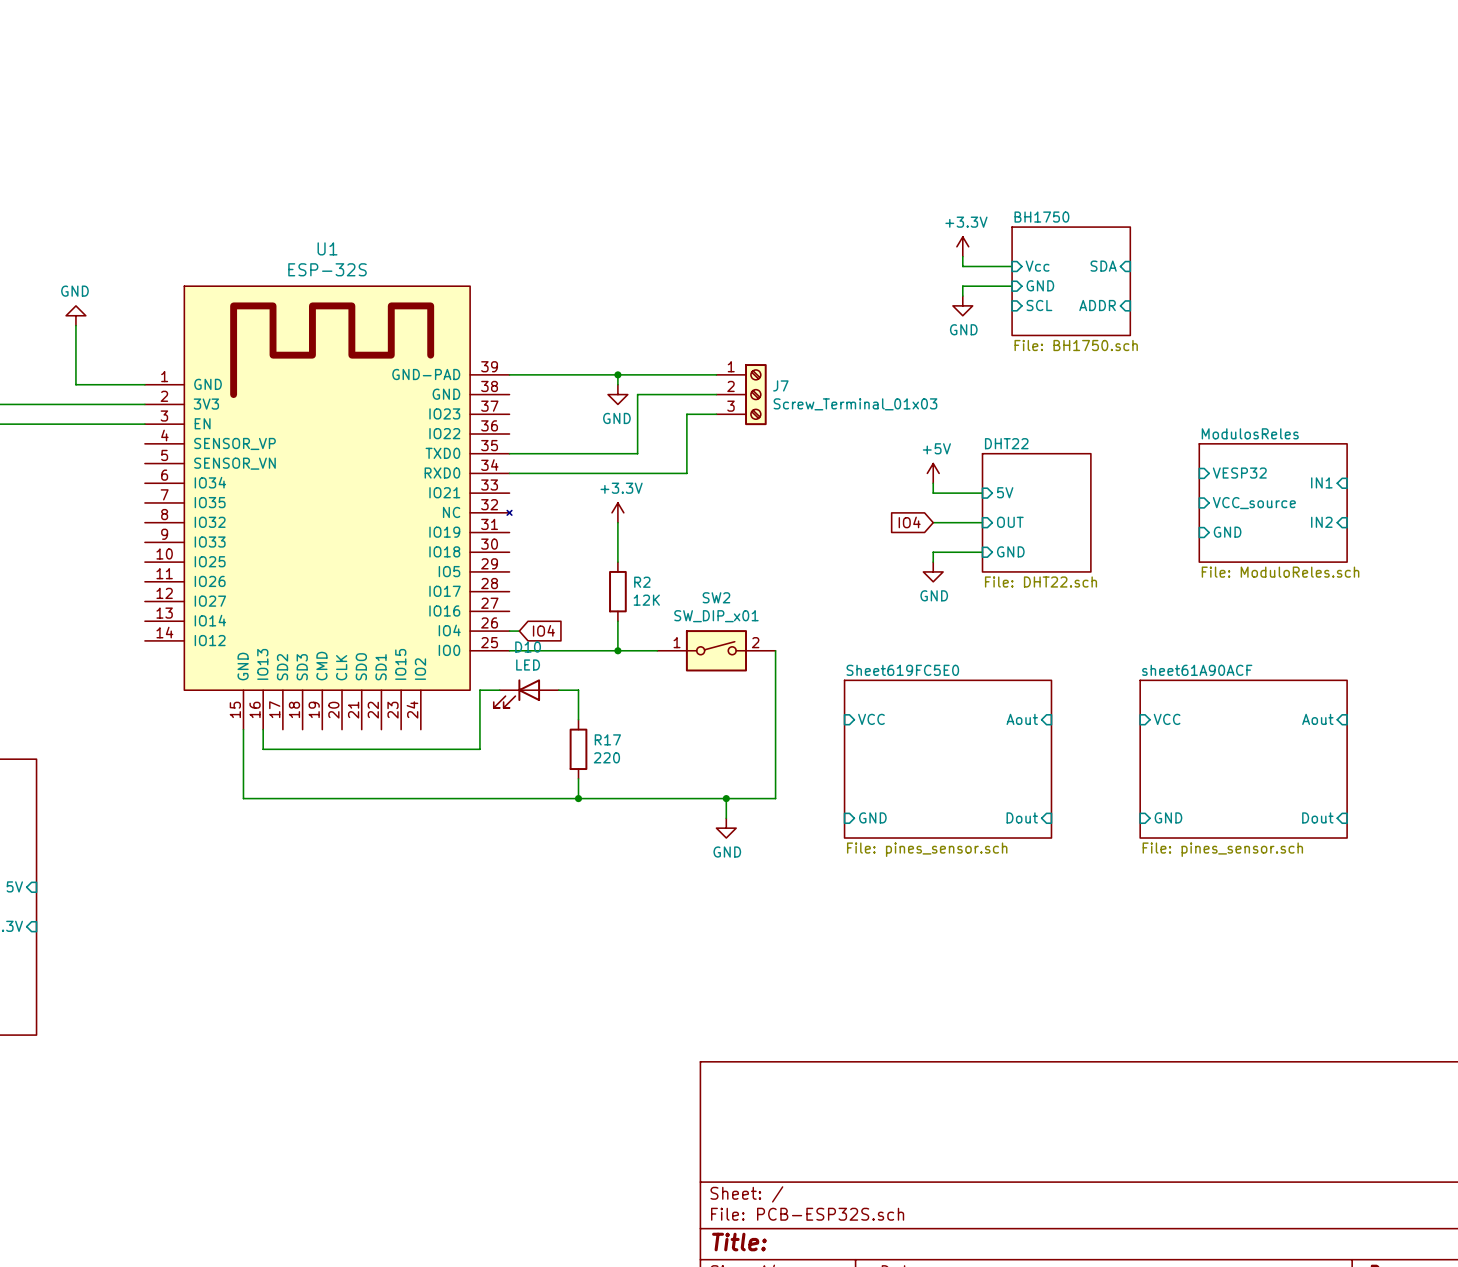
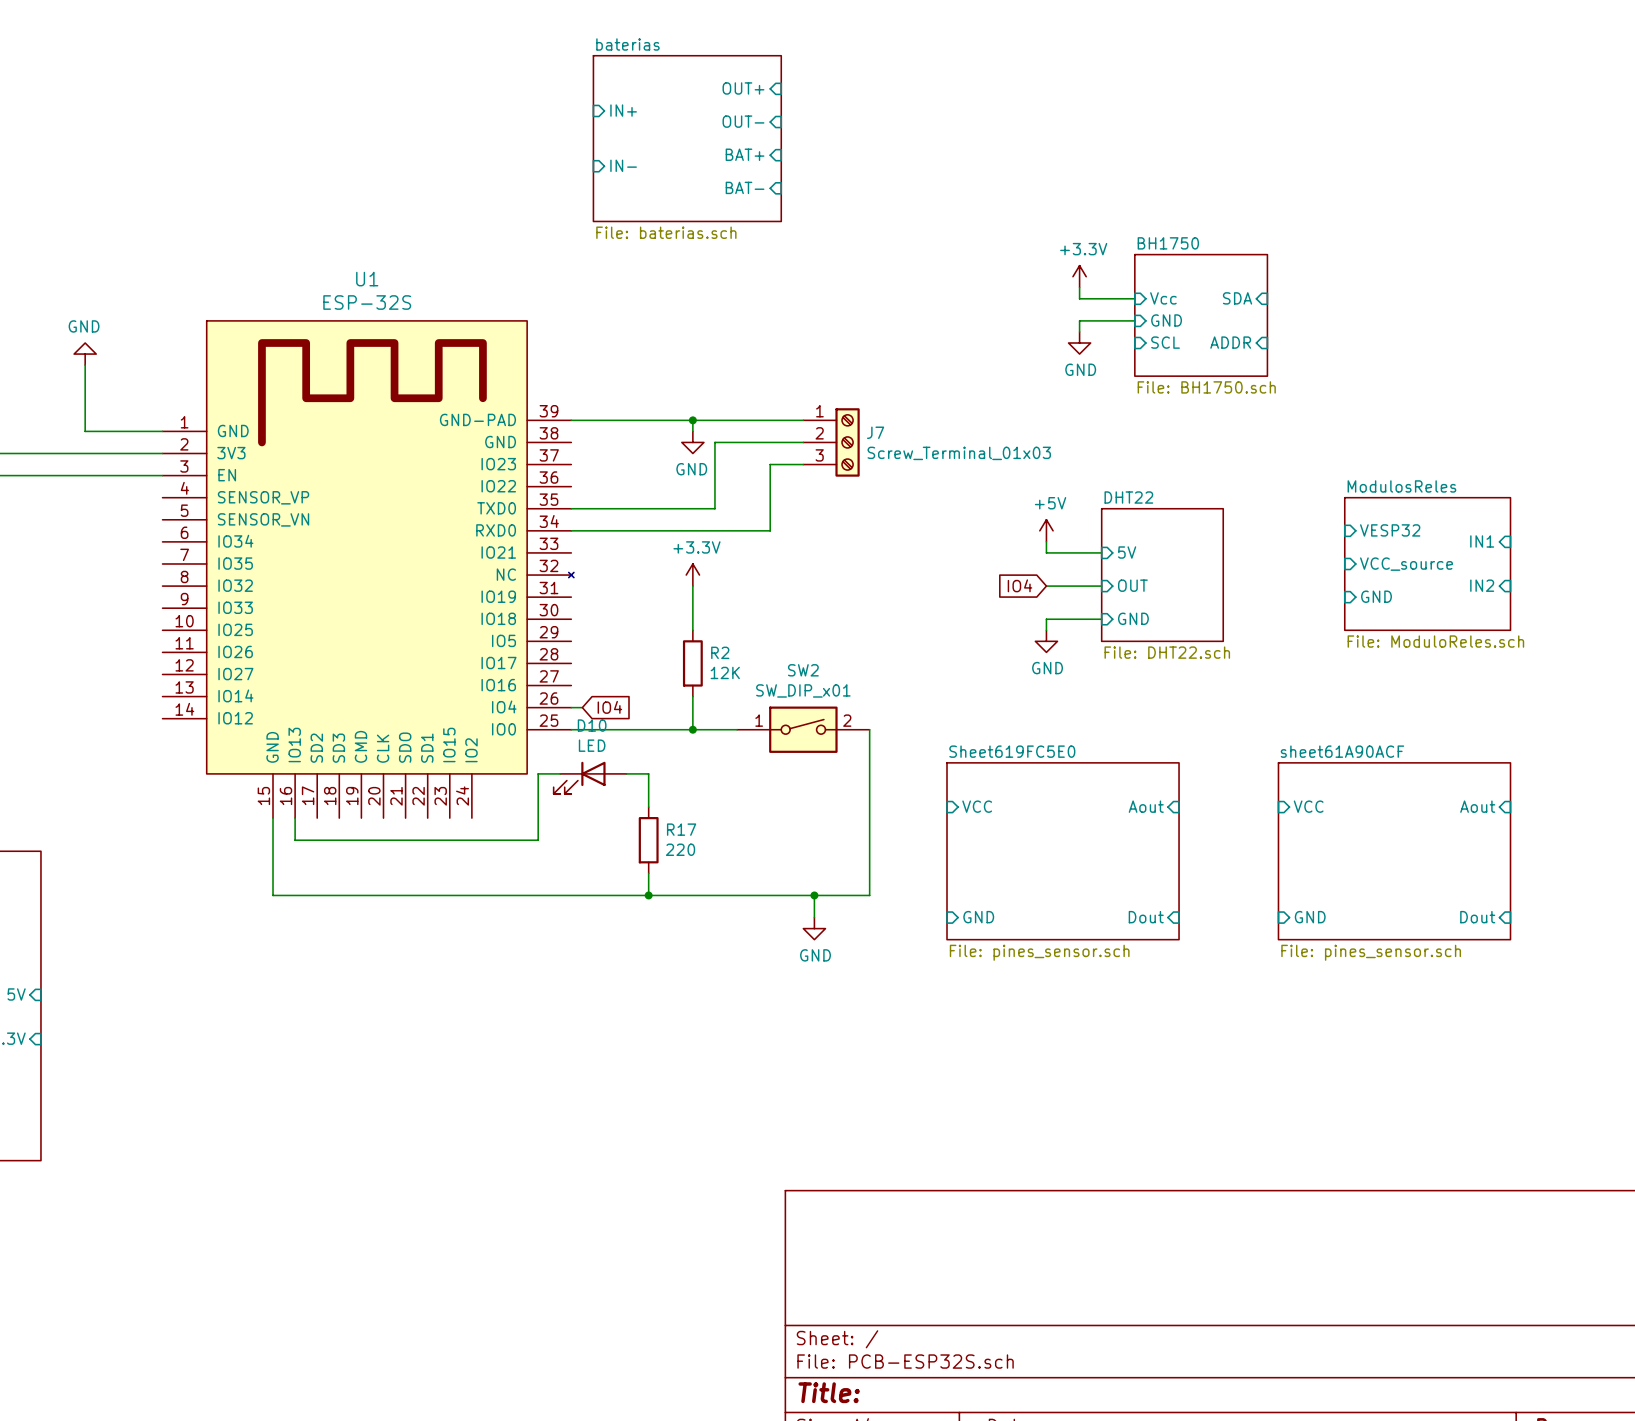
sheet pin: none -> OUT+ (743, 88)
sheet pin: none -> IN+ (623, 110)
sheet pin: none -> OUT- (743, 121)
sheet baterias: none -> File: baterias.sch (687, 138)
sheet pin: none -> BAT+ (745, 154)
sheet pin: none -> IN- (623, 165)
sheet pin: none -> BAT- (745, 187)

